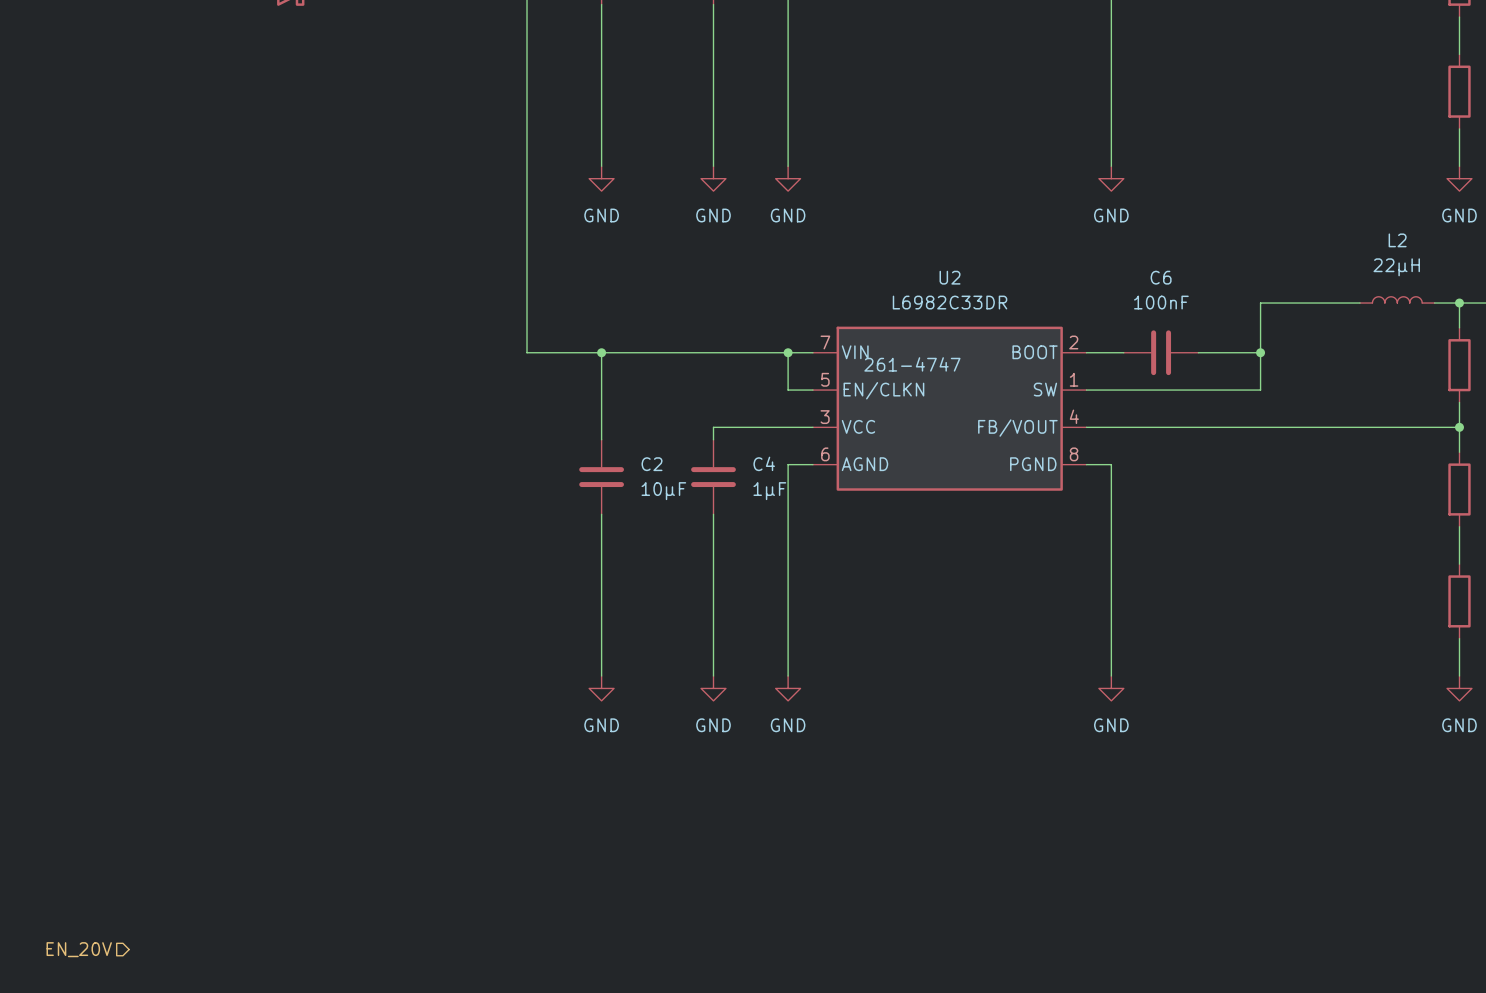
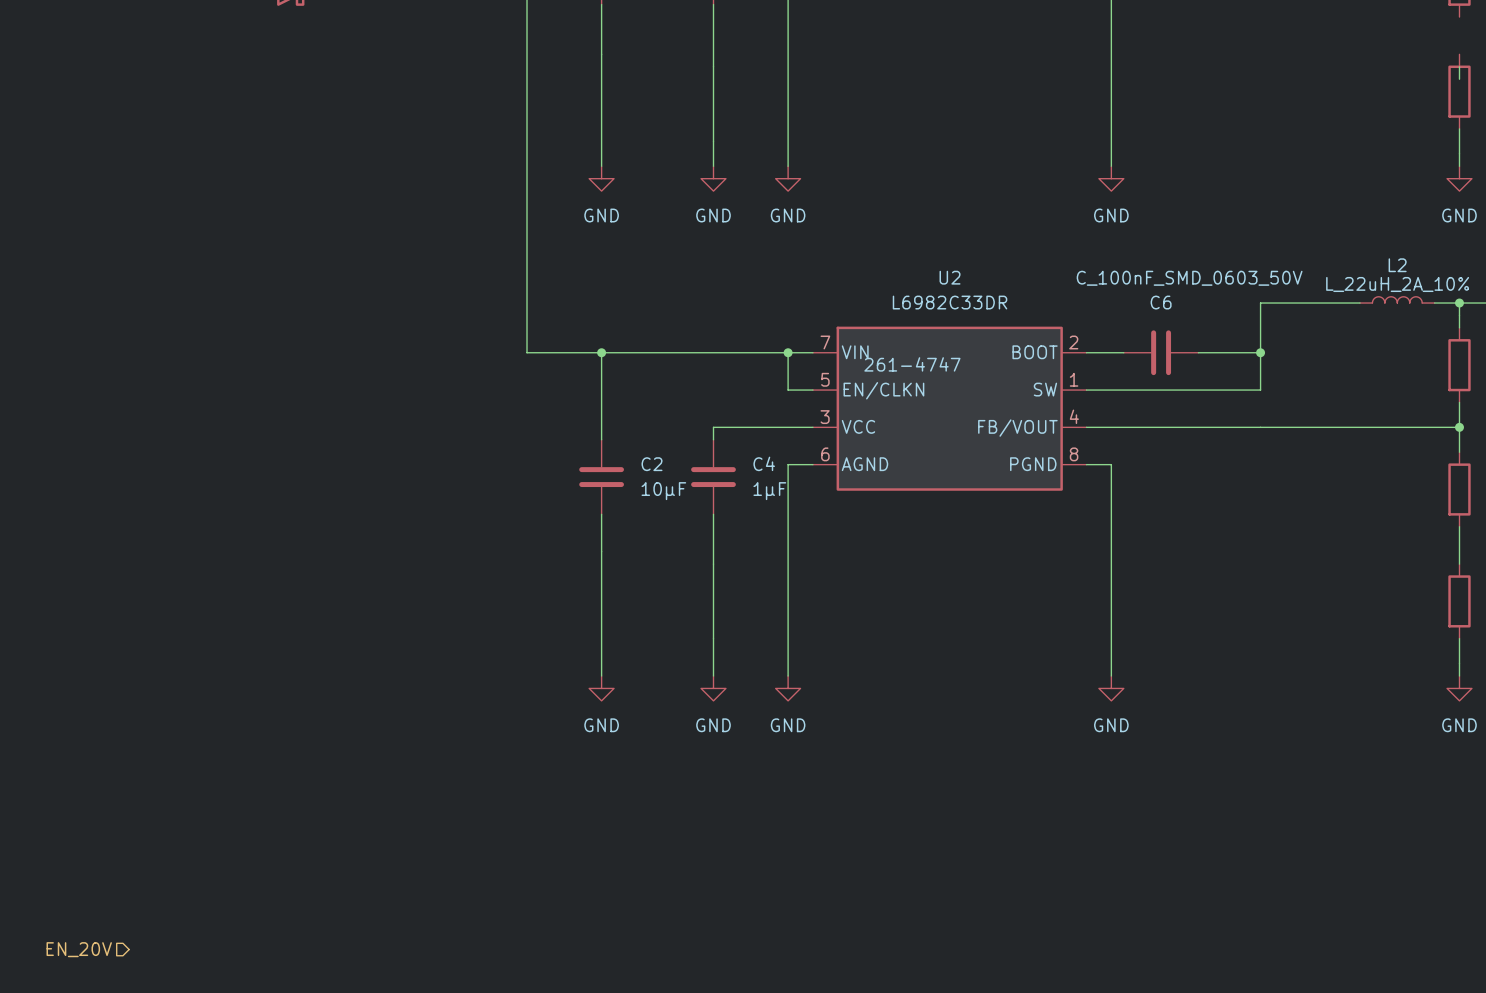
wire: (1459, 17) (1459, 54) -> none
wire: none -> (1459, 66) (1459, 79)
L2 name position: L2 (1397, 240) -> L2 (1397, 265)
L2 value: 22µH (1396, 267) -> L_22uH_2A_10% (1397, 284)
C6 name position: C6 (1161, 277) -> C6 (1161, 302)
C6 value: 100nF (1161, 302) -> C_100nF_SMD_0603_50V (1189, 278)

